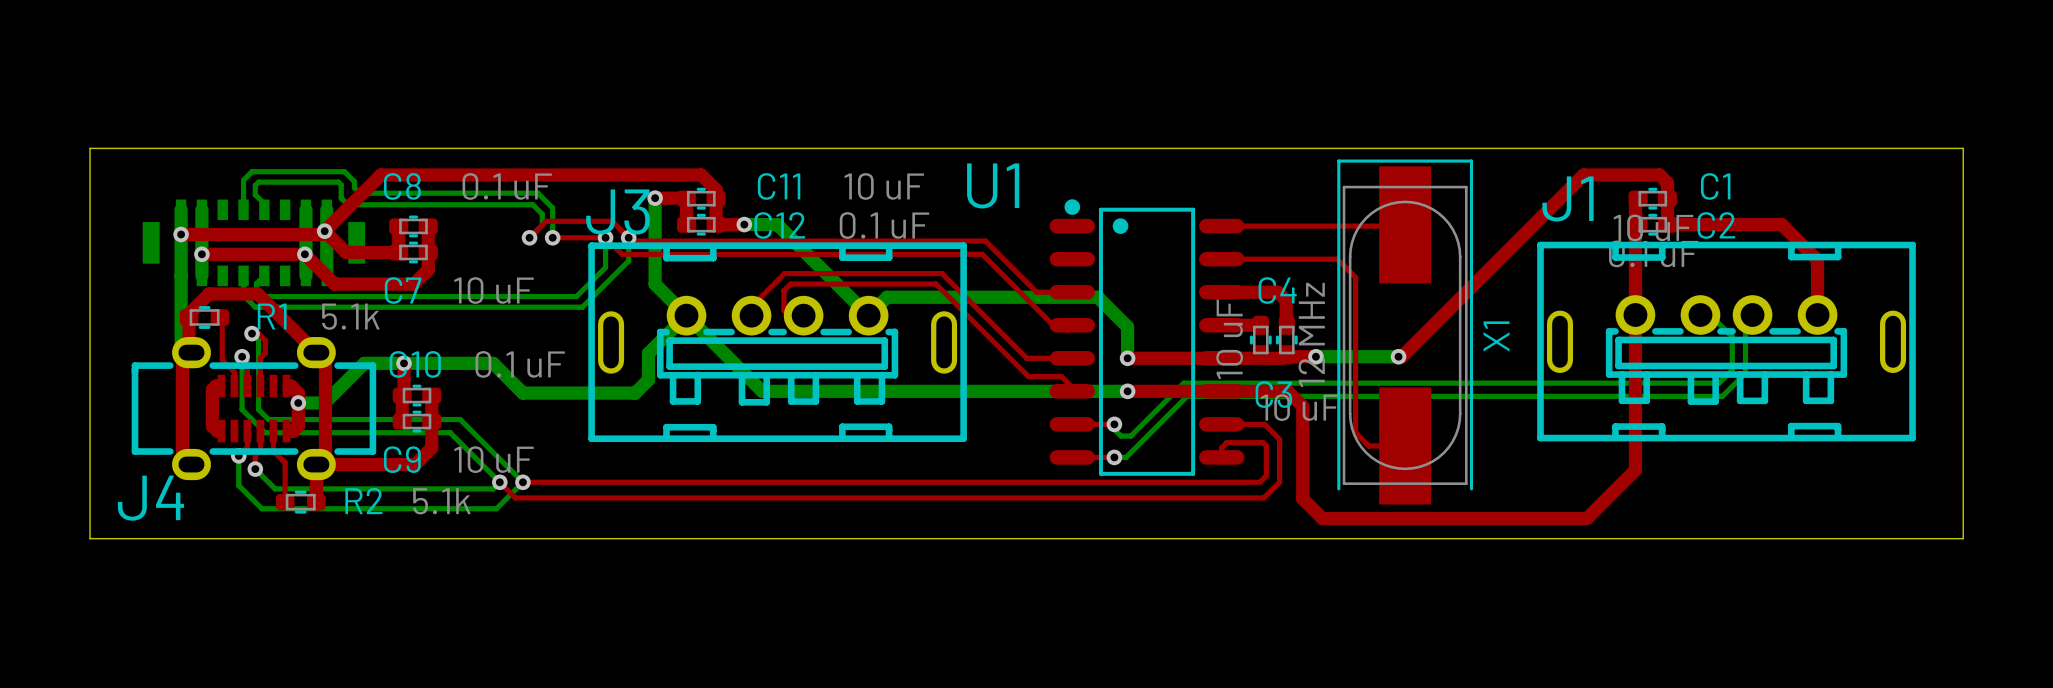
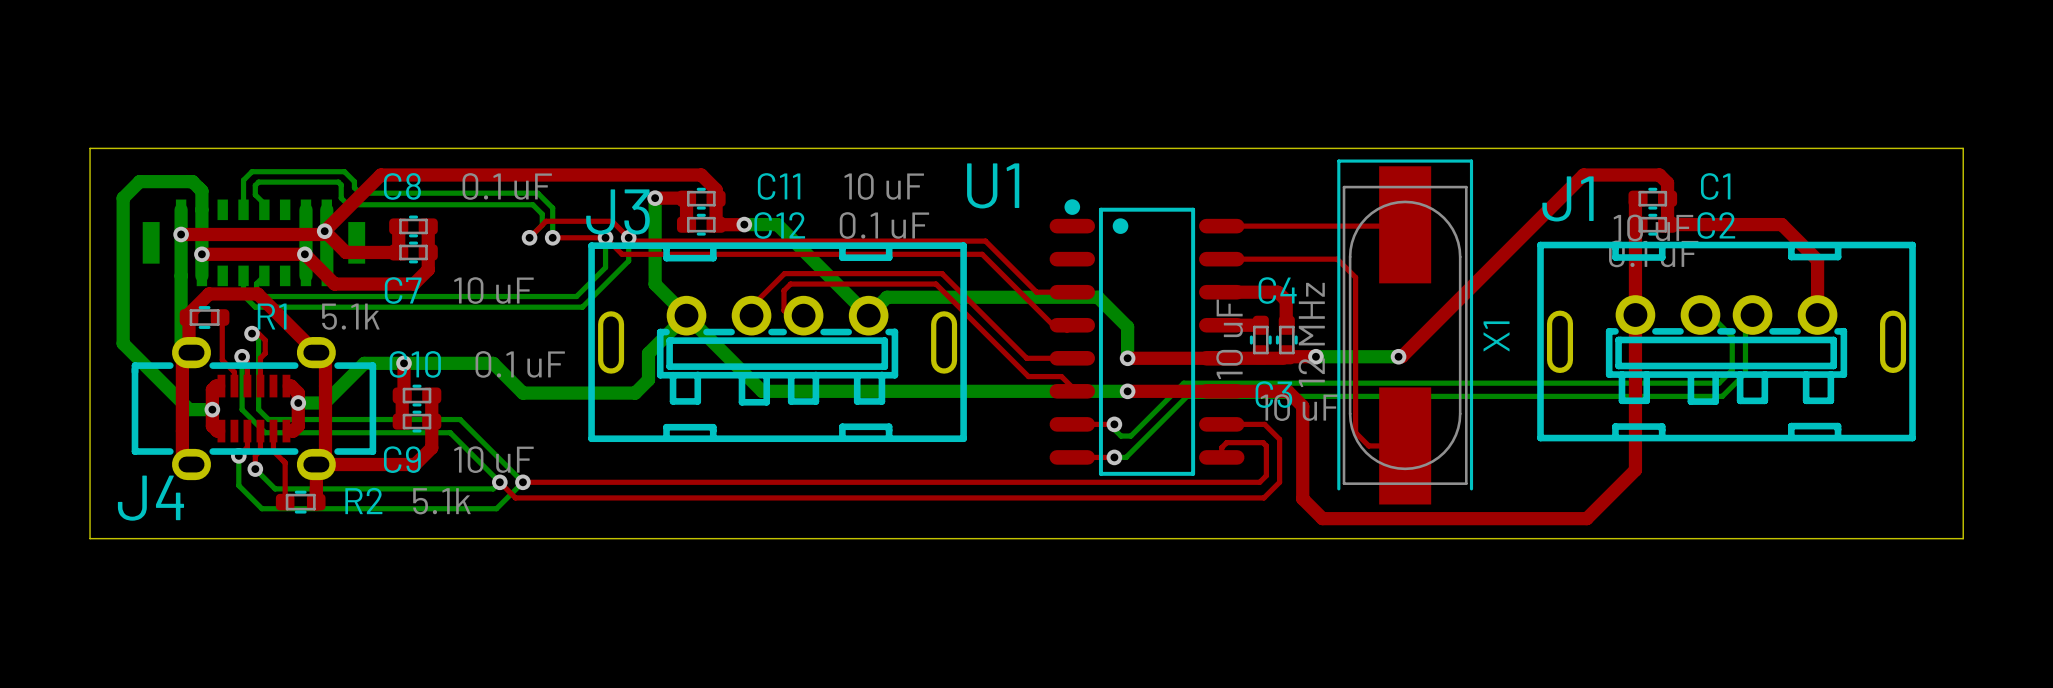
bottom track: none -> (201, 209) (201, 190) (192, 181) (139, 181) (123, 198) (123, 343) (189, 409) (212, 409)
via: none -> (212, 409)

